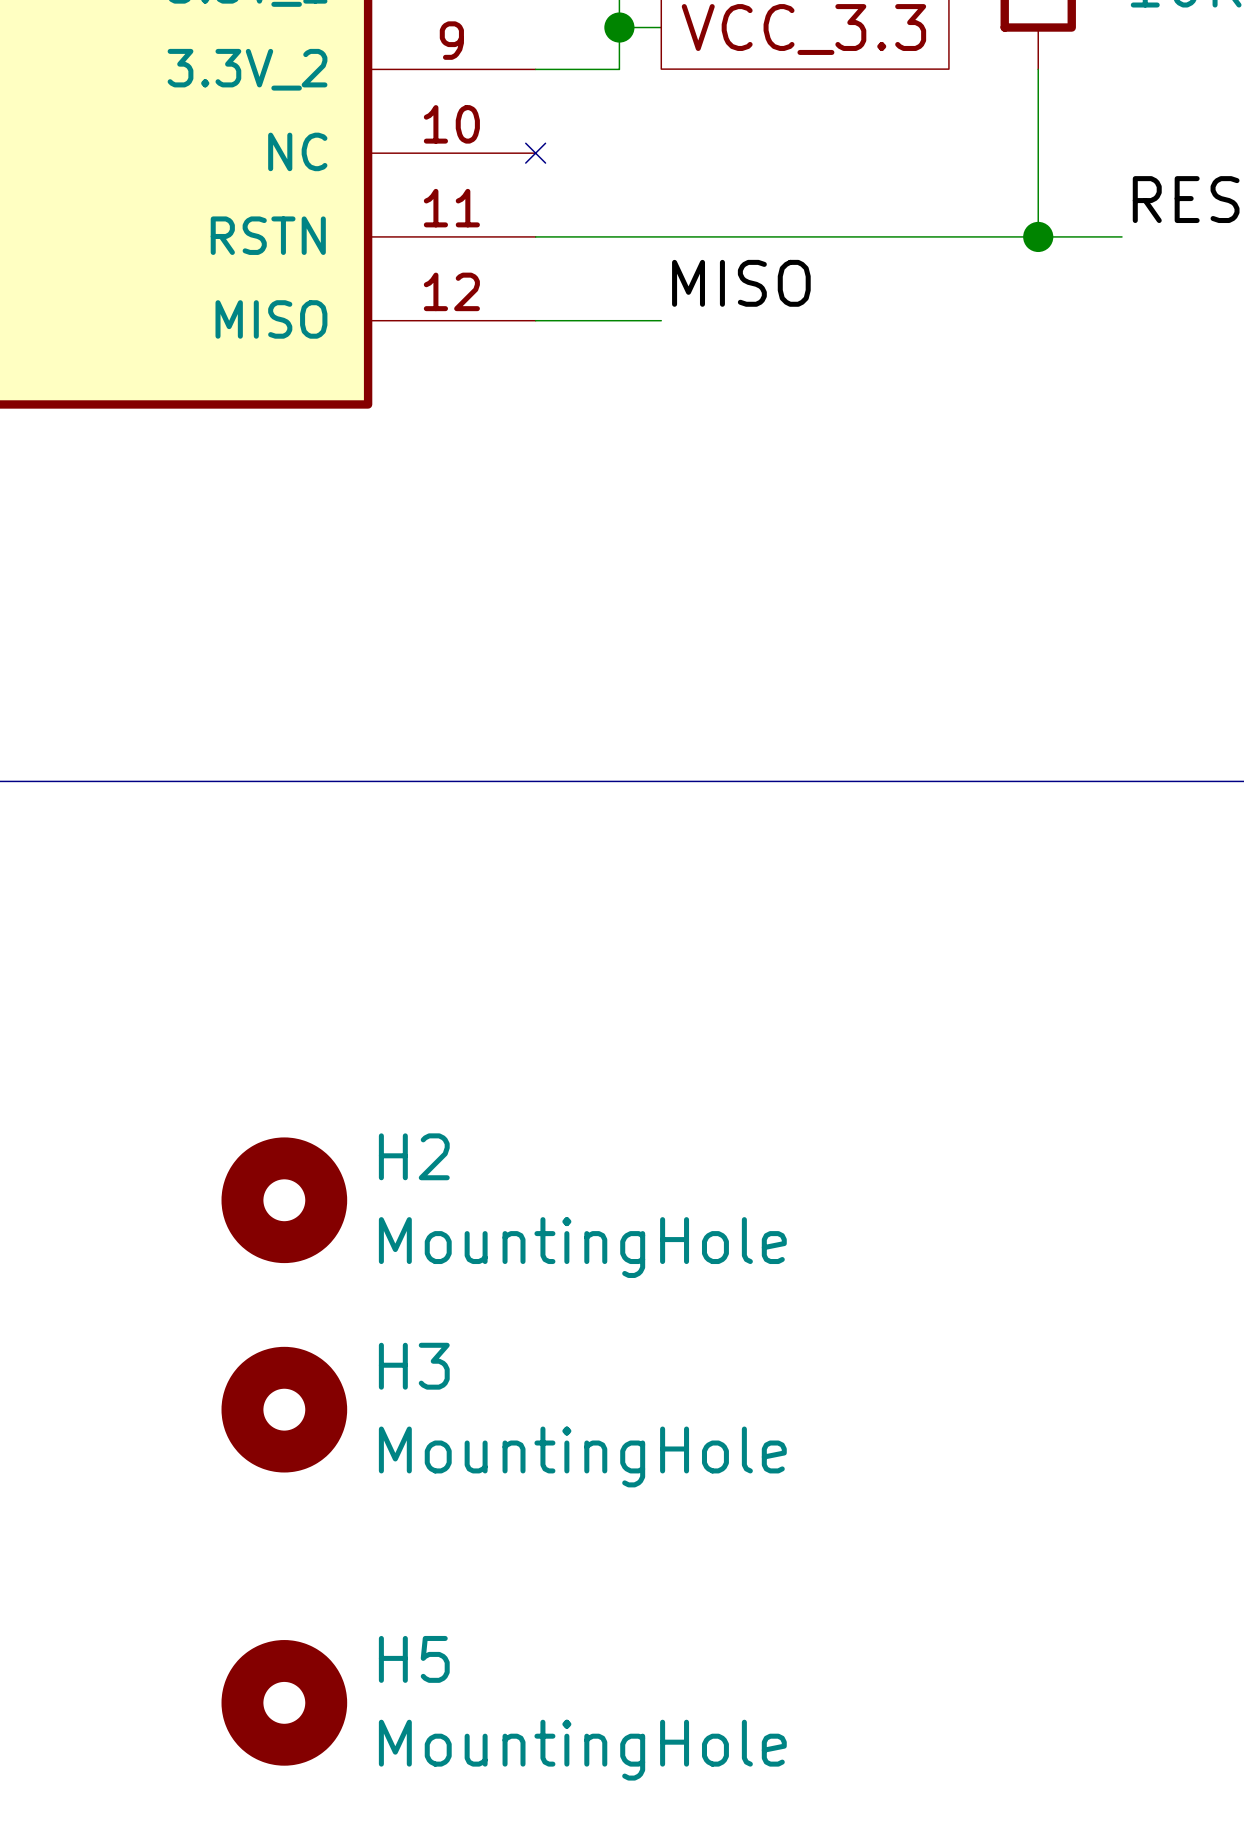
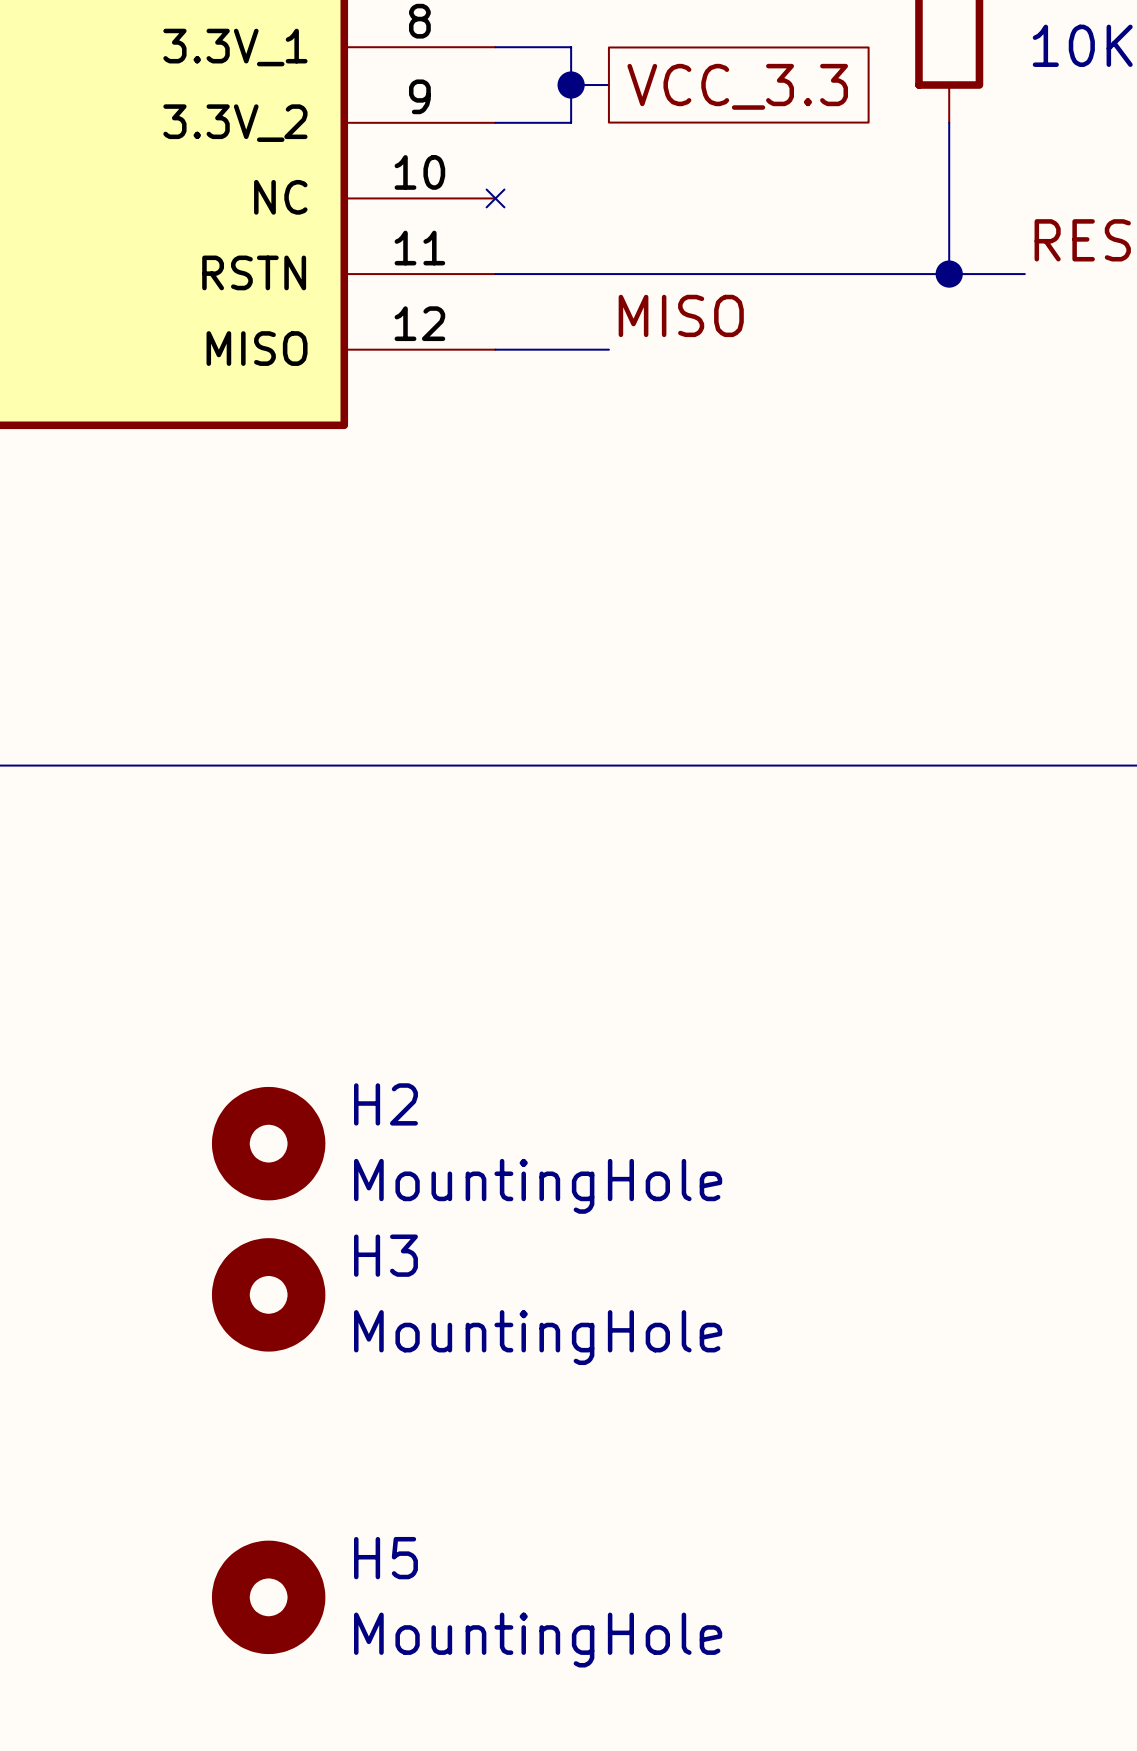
H3 position: (284, 1409) -> (268, 1294)

